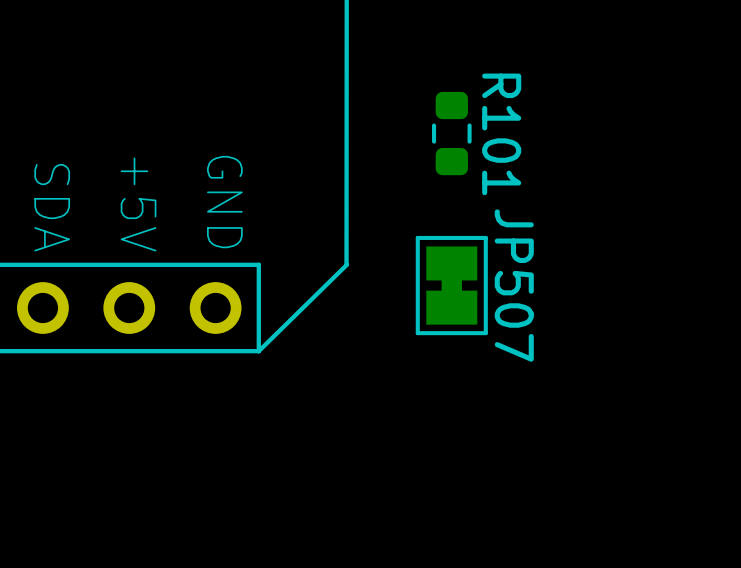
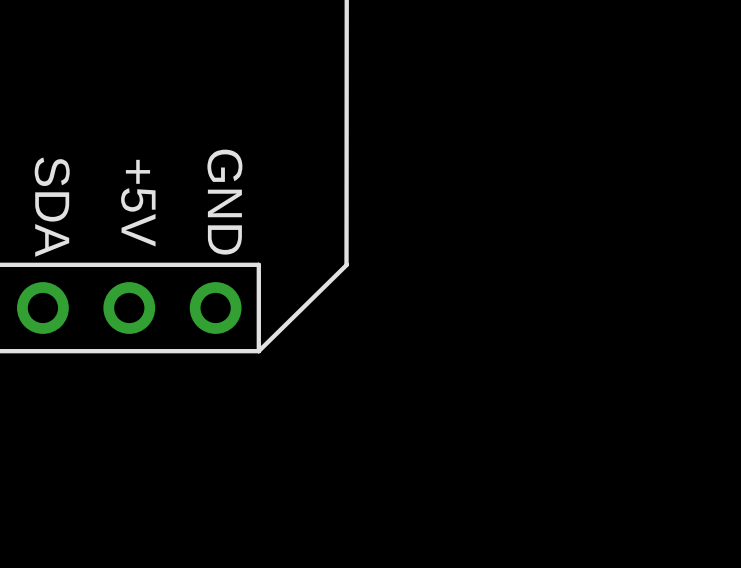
R101: (451, 133) -> none
JP507: (451, 285) -> none

